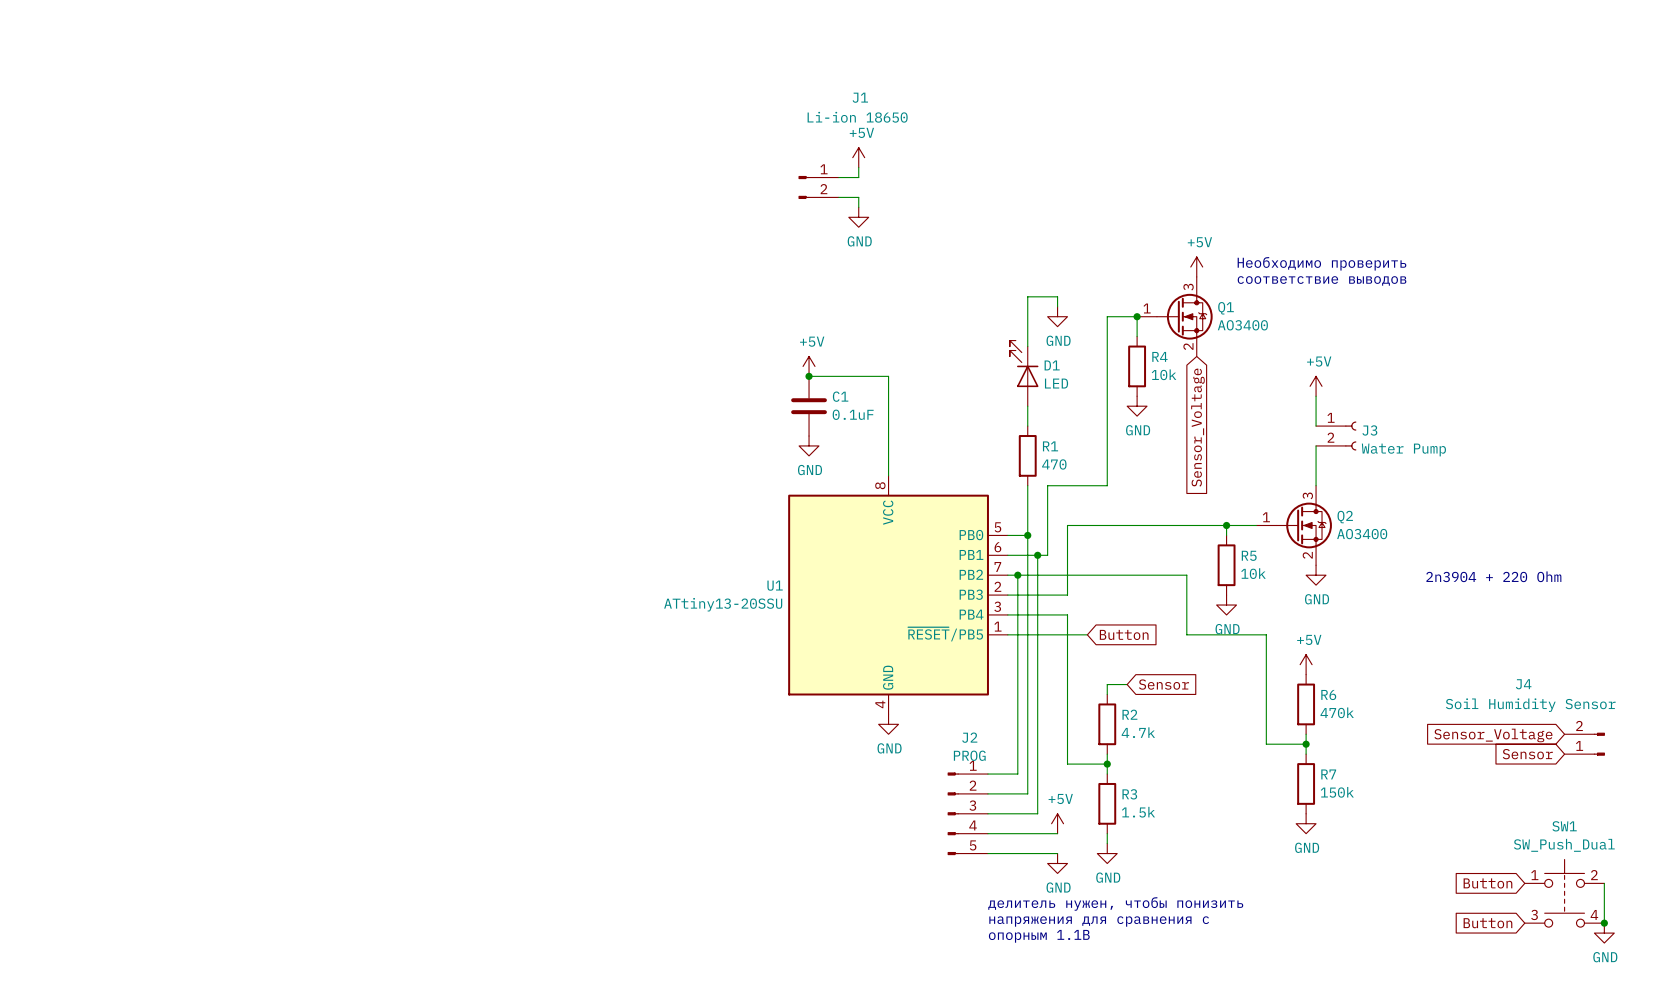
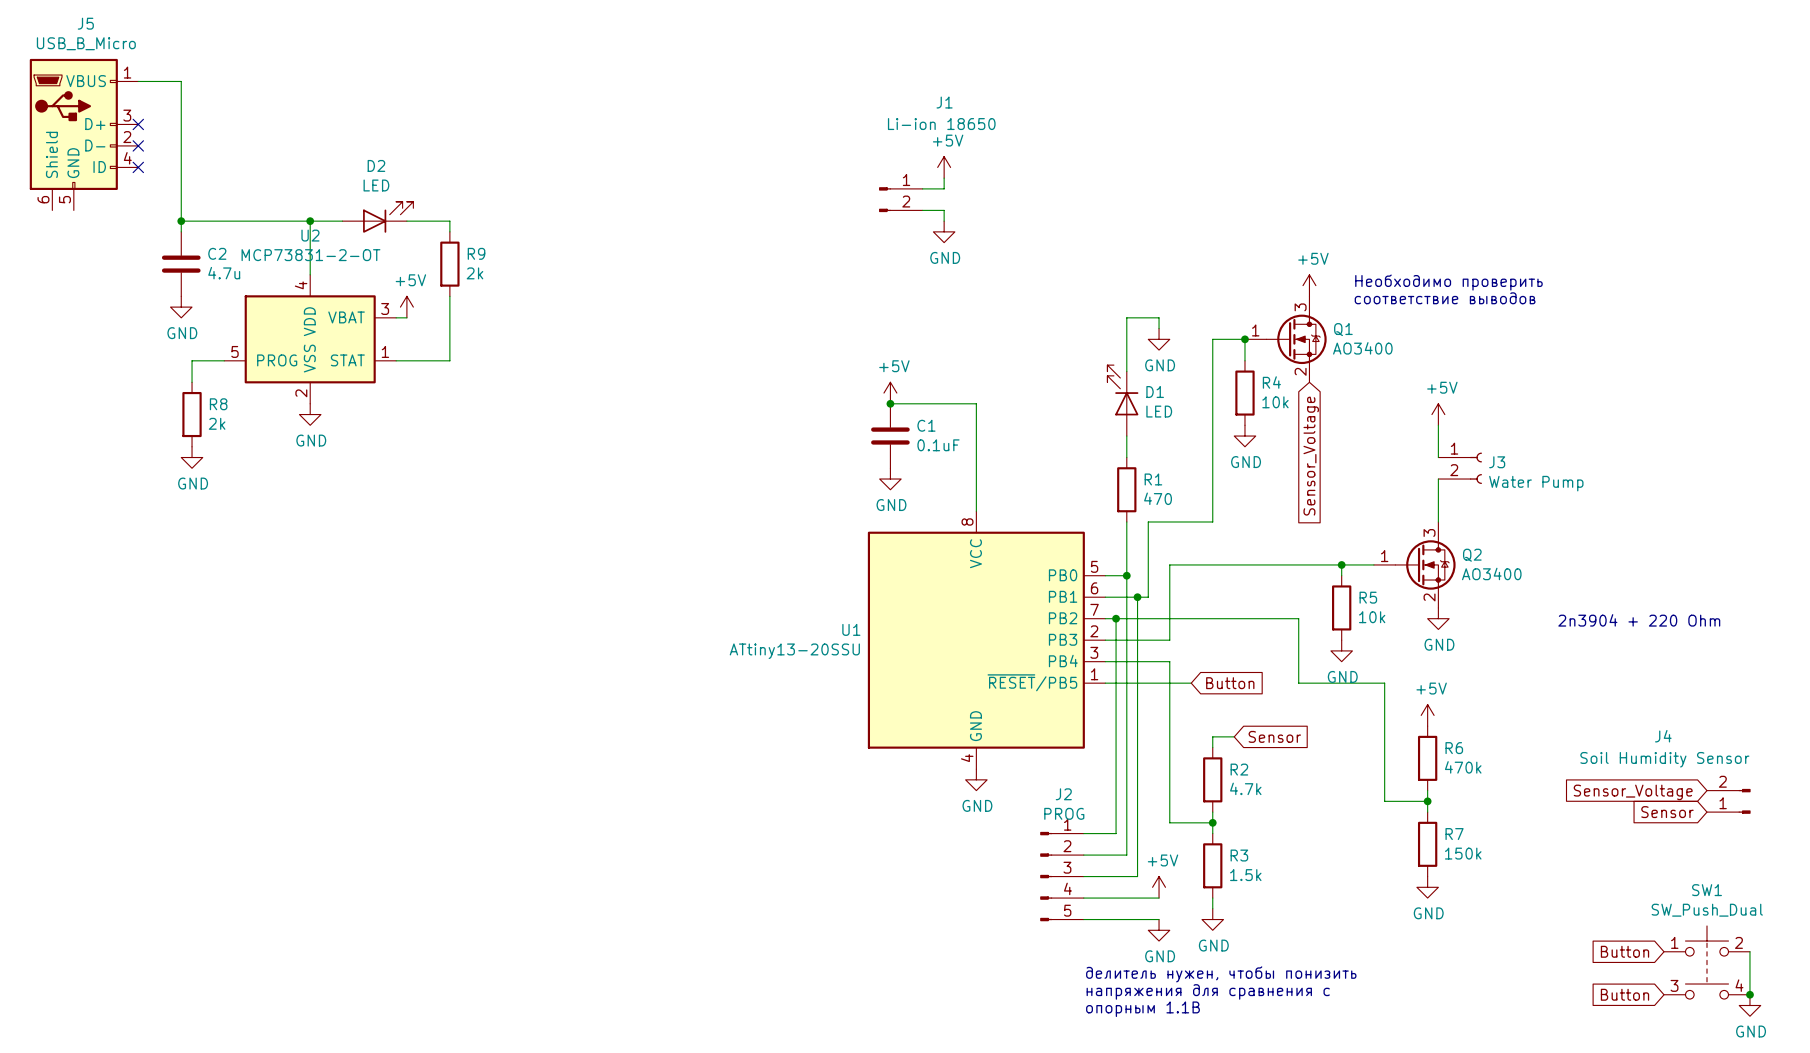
wire: none -> (138, 81) (181, 81) (181, 231)
no-connect mark: none -> (138, 124)
J5: none -> USB_B_Micro (84, 134)
no-connect mark: none -> (138, 145)
no-connect mark: none -> (138, 167)
D2: none -> LED (377, 217)
wire: none -> (181, 221) (342, 221)
junction: none -> (181, 221)
wire: none -> (310, 221) (310, 274)
junction: none -> (310, 221)
wire: none -> (406, 221) (449, 221) (449, 231)
C2: none -> 4.7u (181, 264)
R9: none -> 2k (449, 264)
wire: none -> (449, 296) (449, 360) (396, 360)
power symbol: none -> GND (181, 307)
power symbol: none -> +5V (406, 307)
wire: none -> (396, 317) (406, 317)
U2: none -> MCP73831-2-OT (310, 339)
wire: none -> (224, 360) (192, 360) (192, 382)
R8: none -> 2k (192, 414)
power symbol: none -> GND (310, 414)
power symbol: none -> GND (192, 457)

